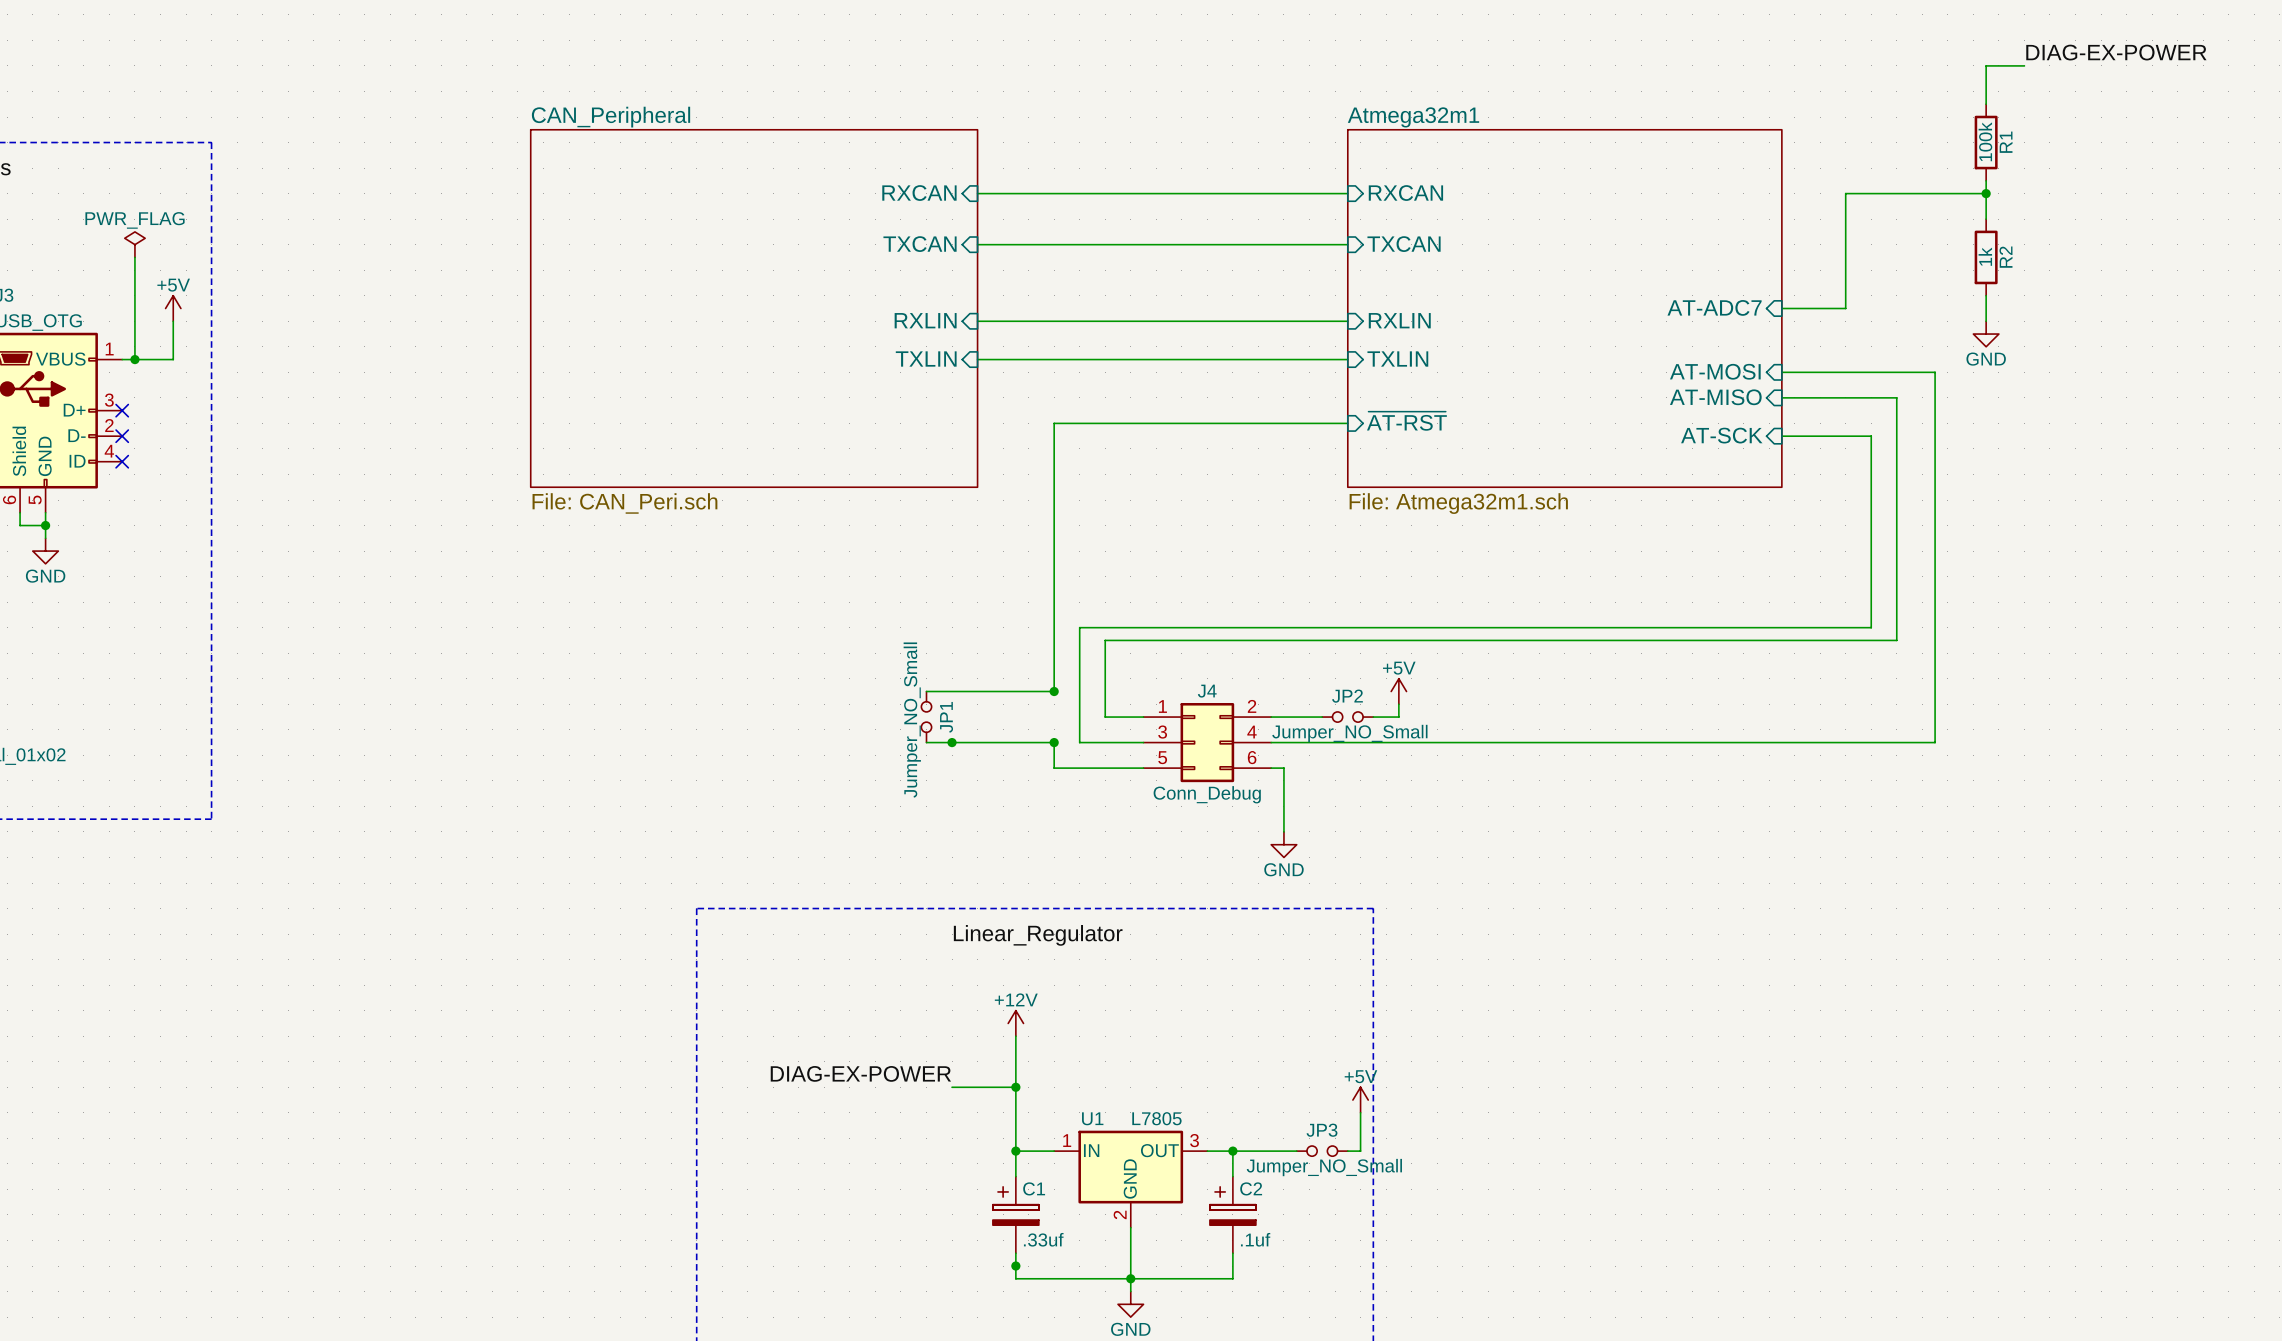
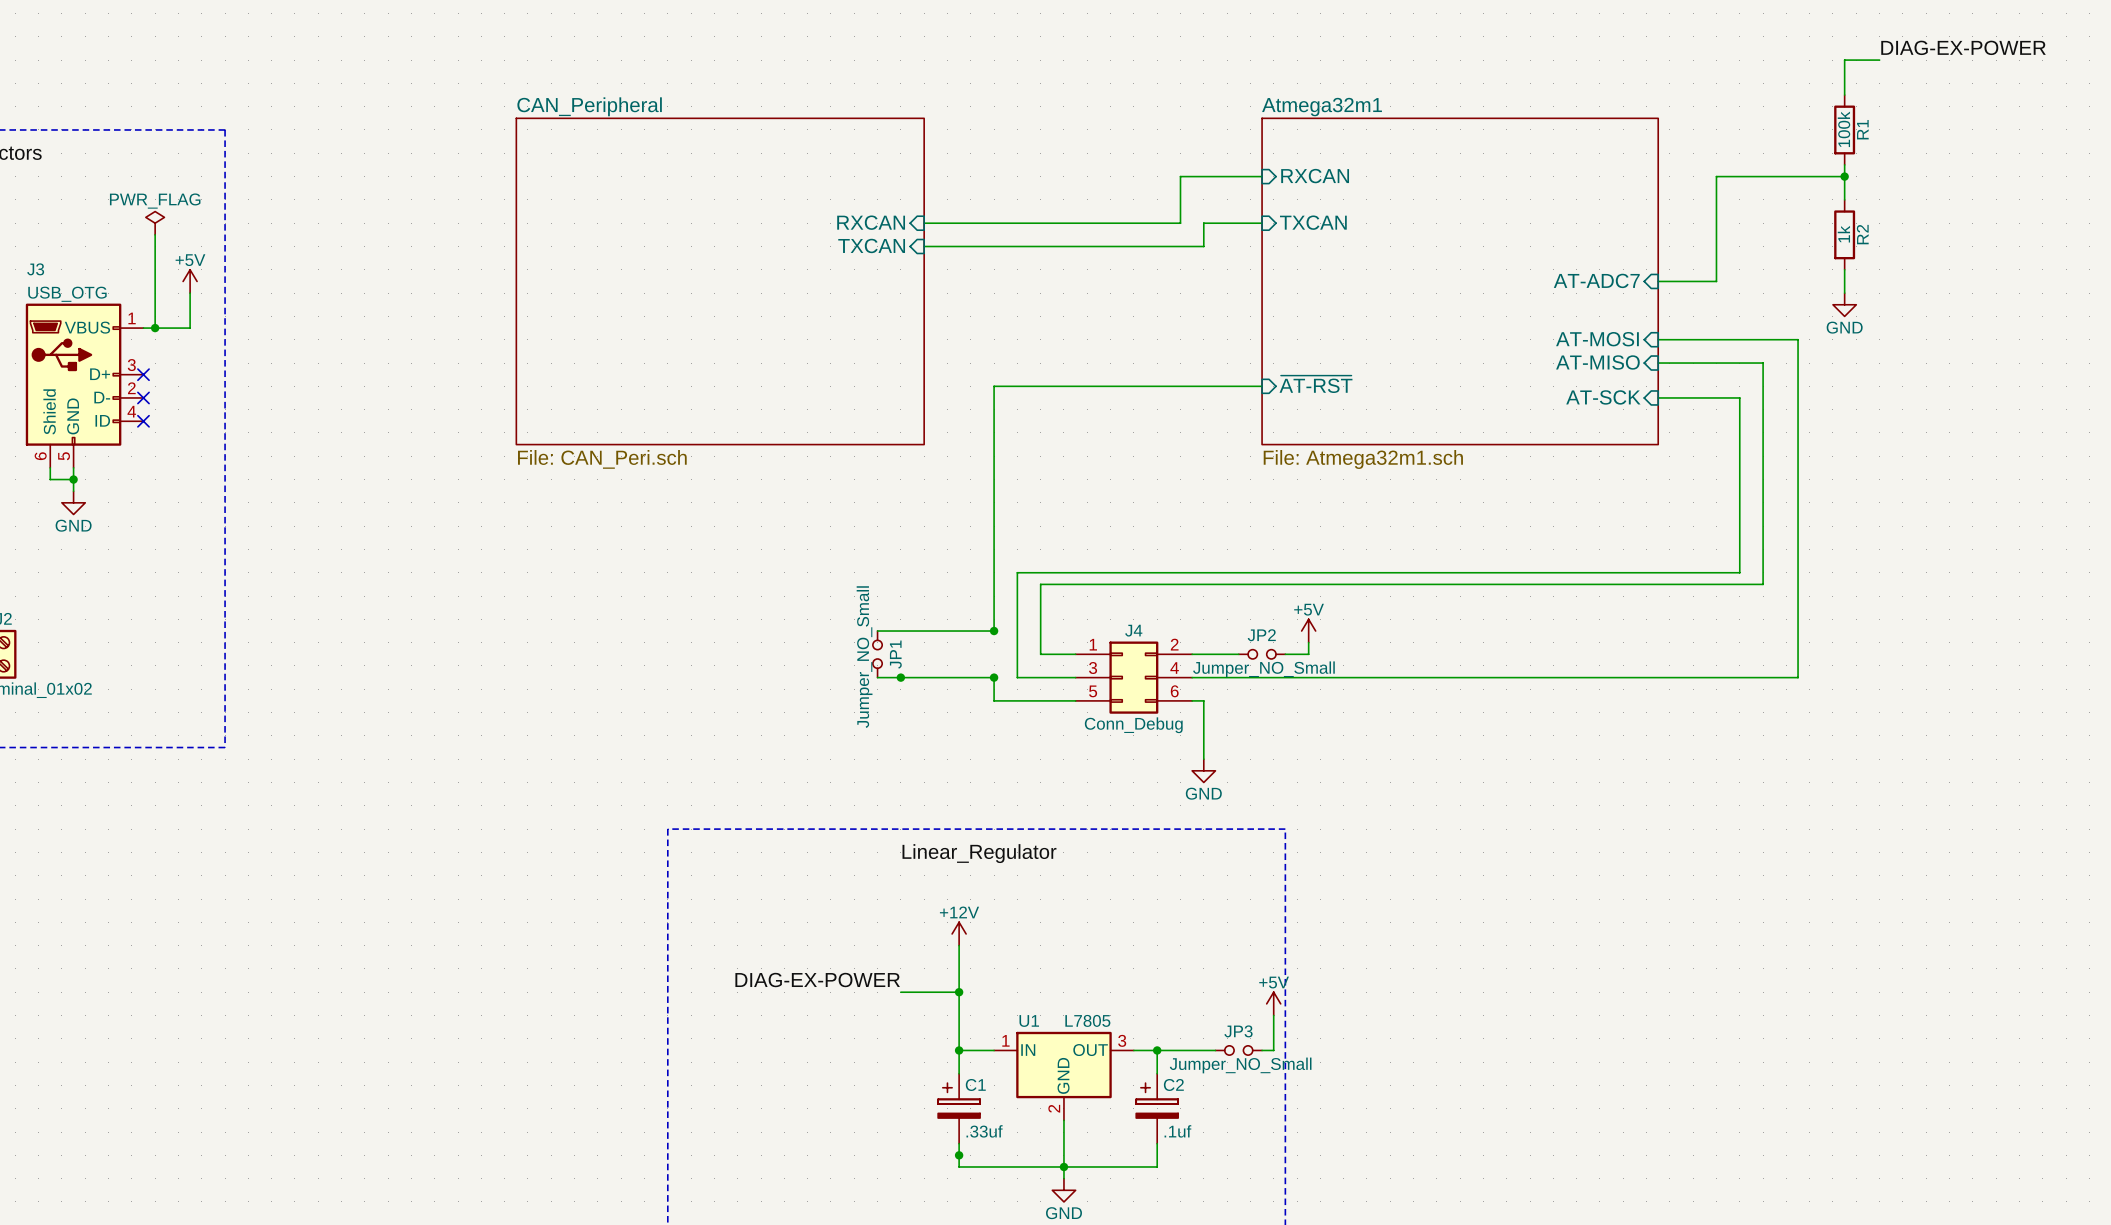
sheet pin: RXCAN (919, 193) -> none
wire: (977, 193) (1258, 193) -> none
sheet pin: TXCAN (920, 244) -> RXCAN (871, 222)
wire: (1258, 244) (1283, 244) -> (1180, 223) (1180, 176)
wire: none -> (1203, 223) (1203, 246) (924, 246)
sheet pin: none -> TXCAN (871, 245)
sheet pin: RXLIN (925, 320) -> none
sheet pin: RXLIN (1399, 320) -> none
wire: (977, 321) (1347, 321) -> none
sheet pin: TXLIN (926, 358) -> none
sheet pin: TXLIN (1397, 358) -> none
wire: (977, 359) (1347, 359) -> none

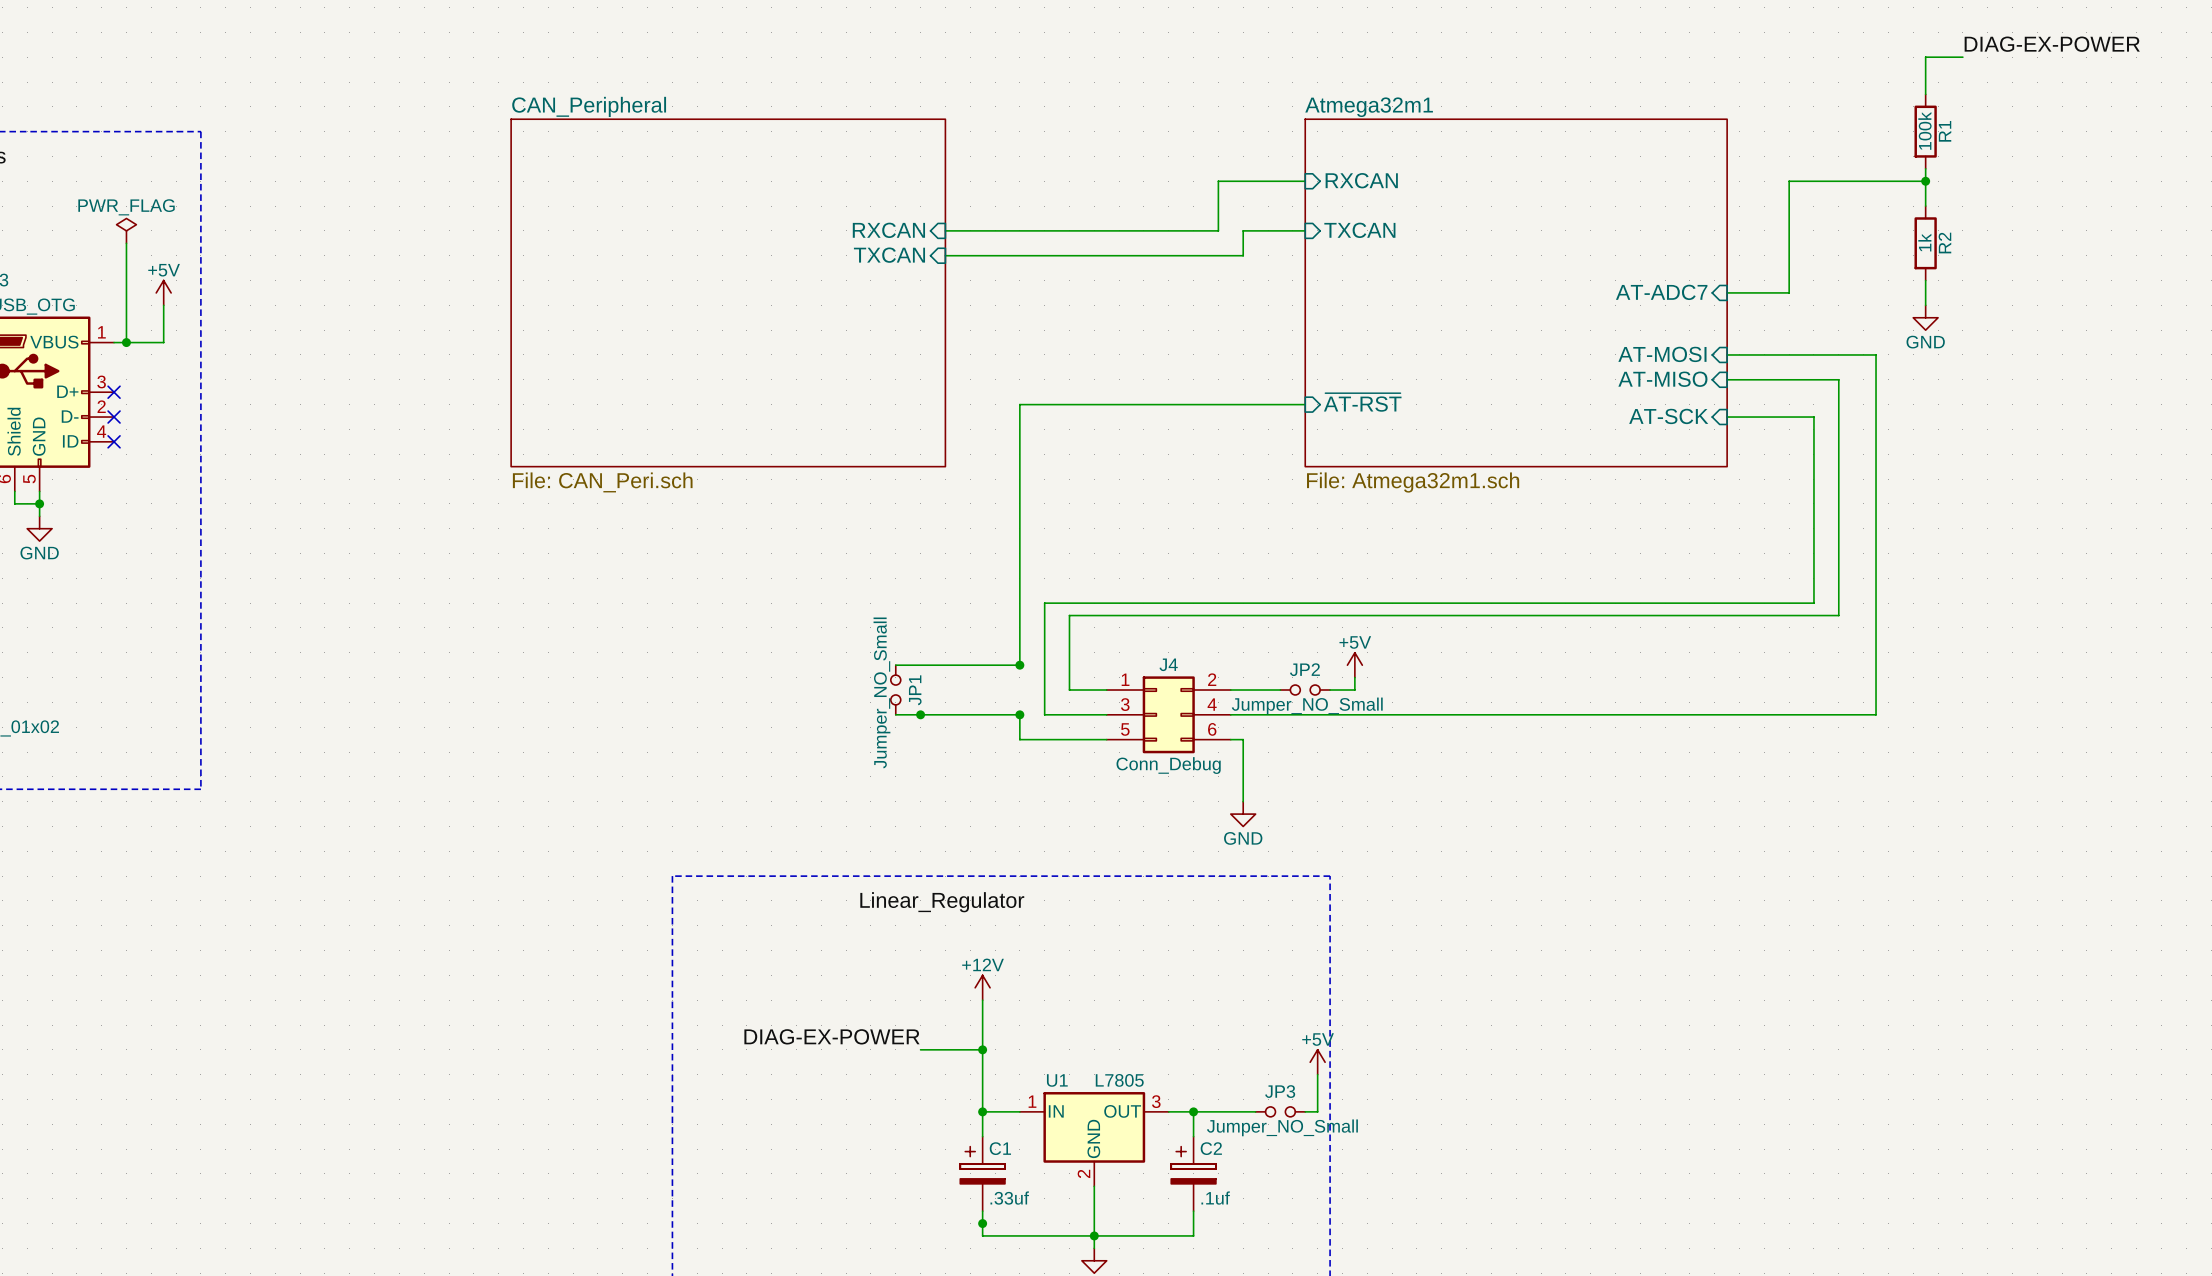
label position: Linear_Regulator (979, 853) -> Linear_Regulator (942, 902)

